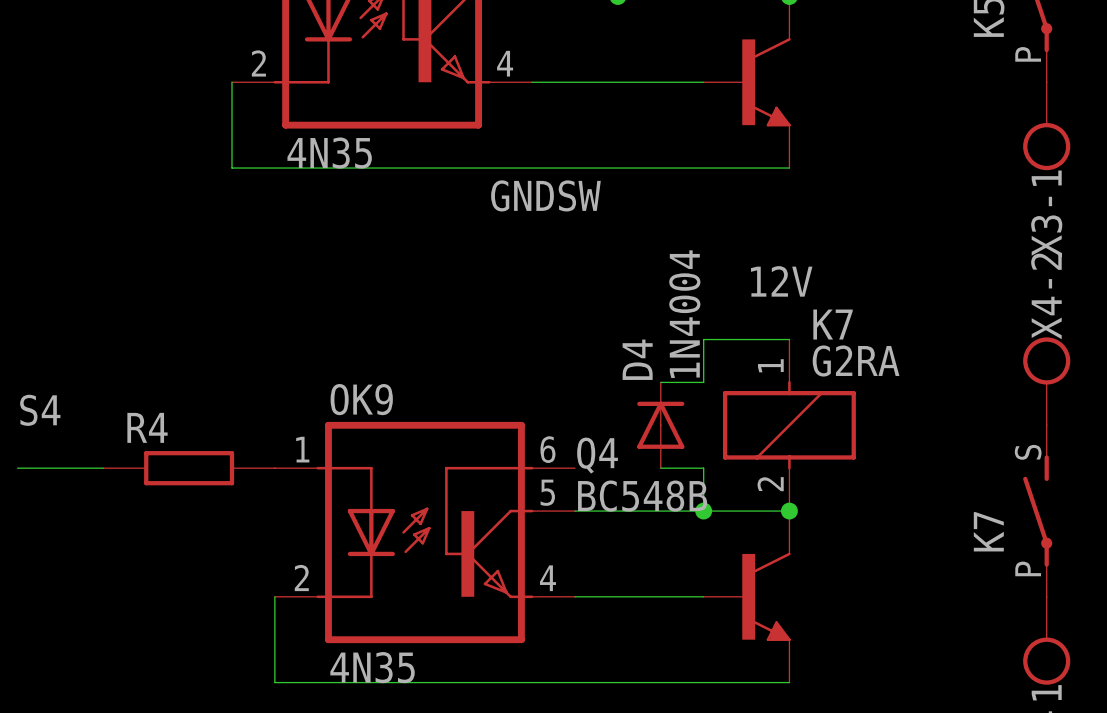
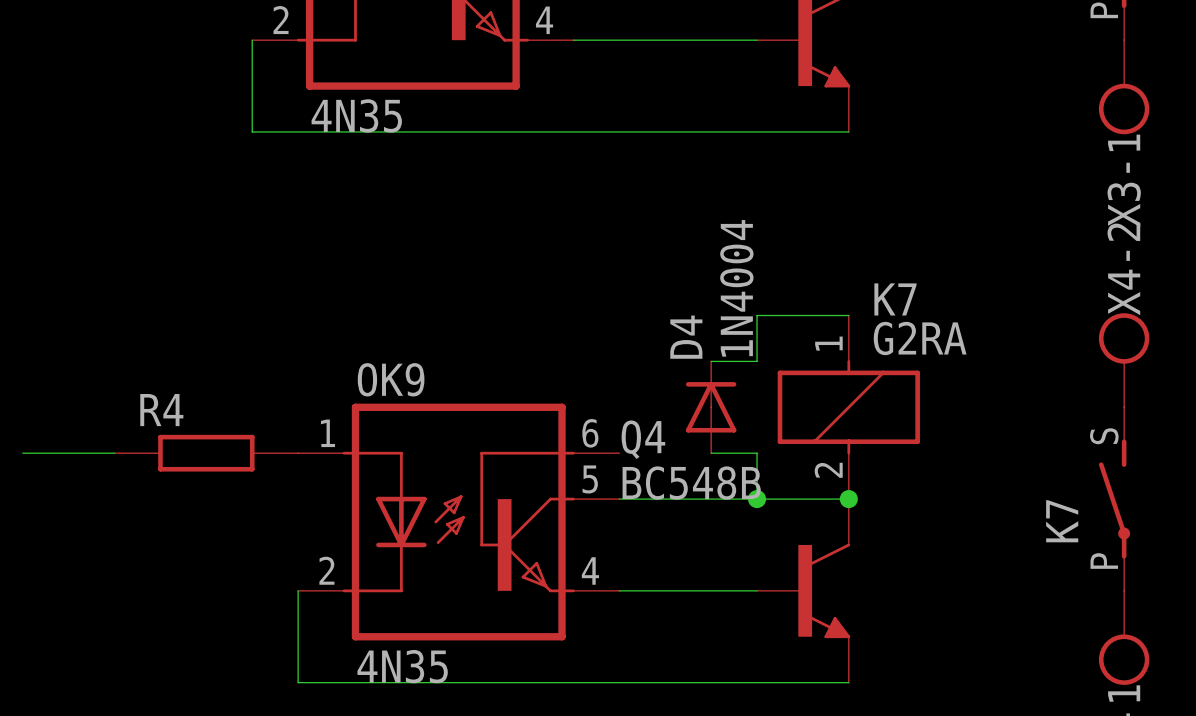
label: GNDSW (545, 195) -> none
label: 12V (781, 281) -> none
label: S4 (40, 410) -> none

